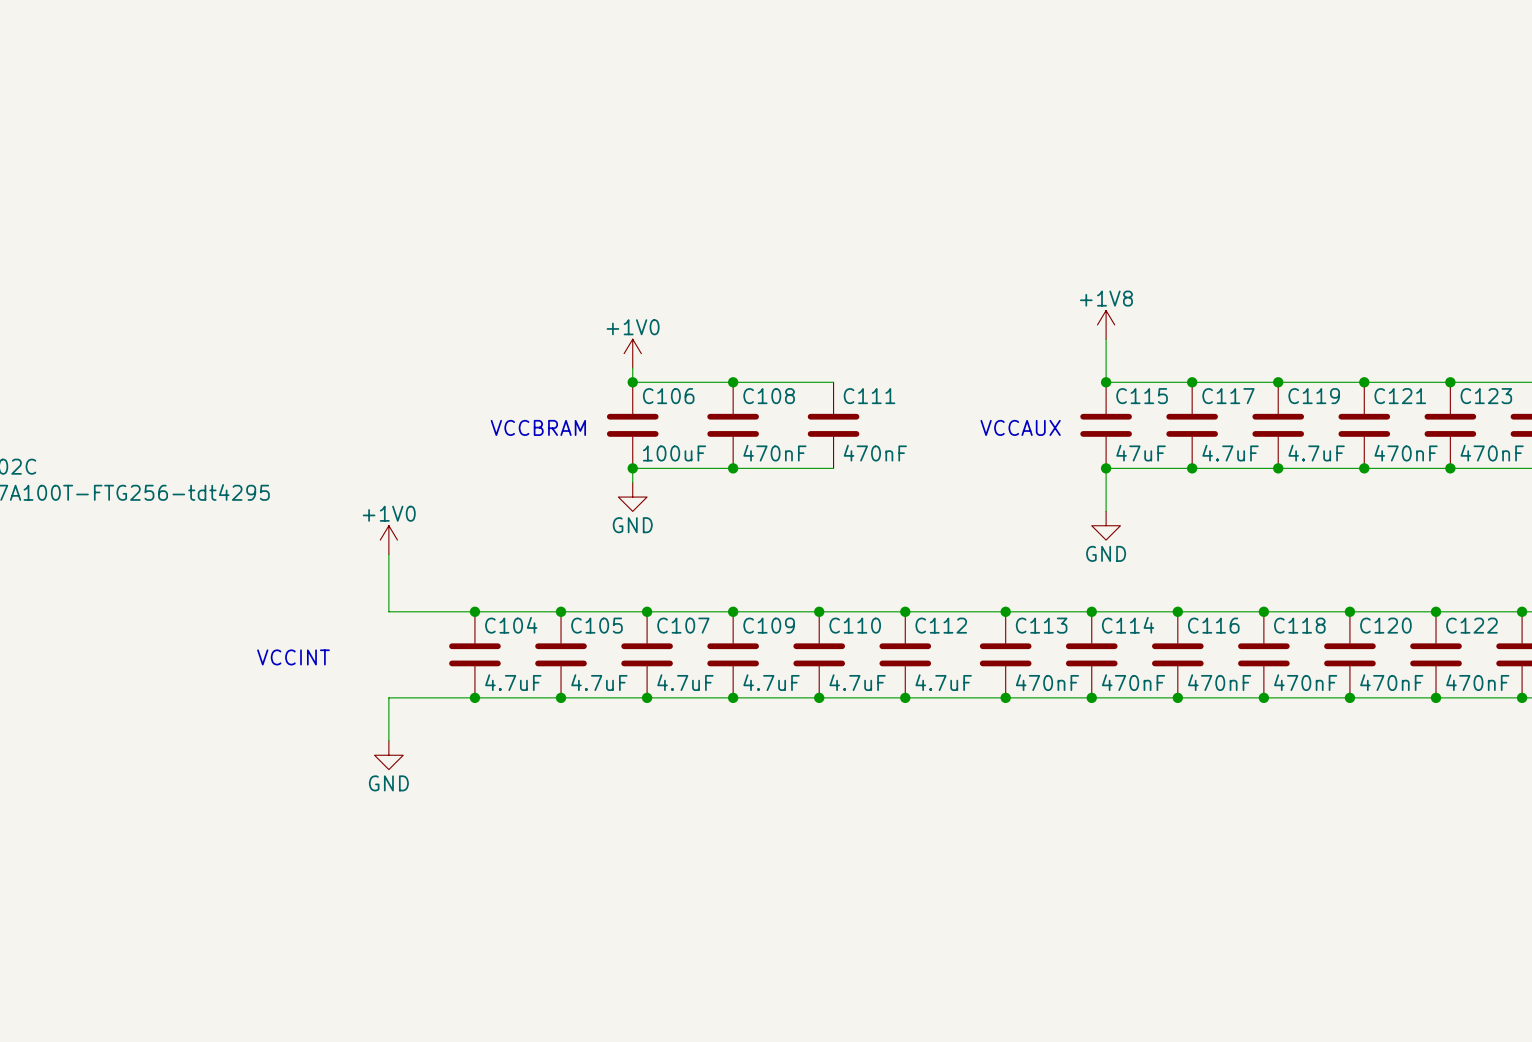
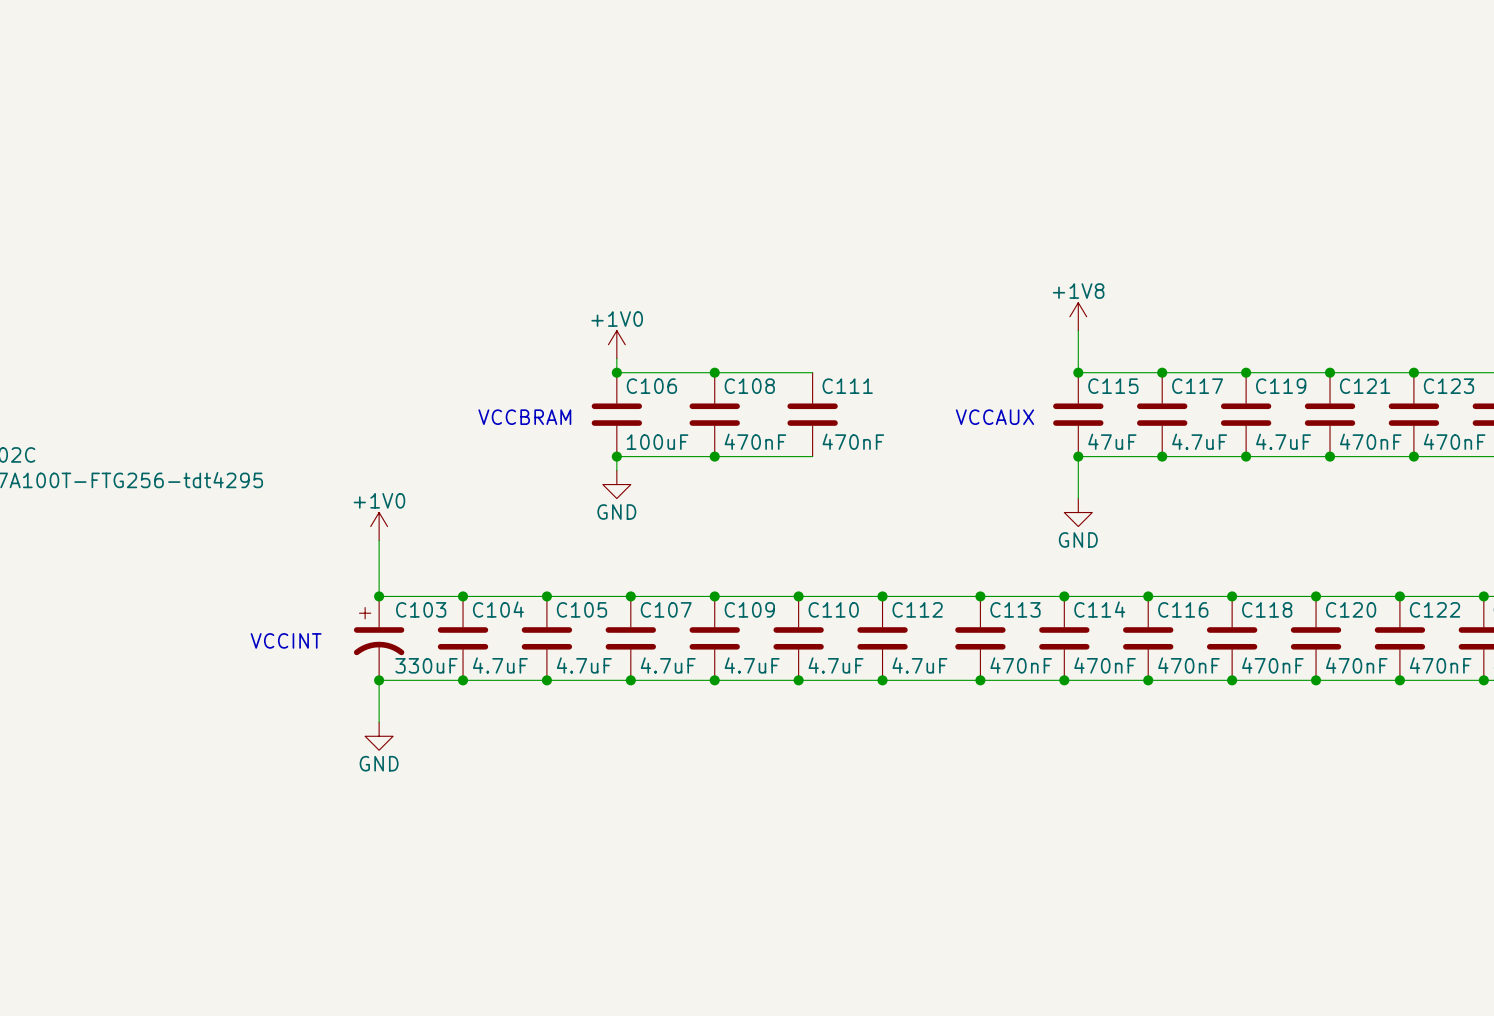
junction: none -> (379, 596)
C103: none -> 330uF (379, 638)
junction: none -> (379, 680)

